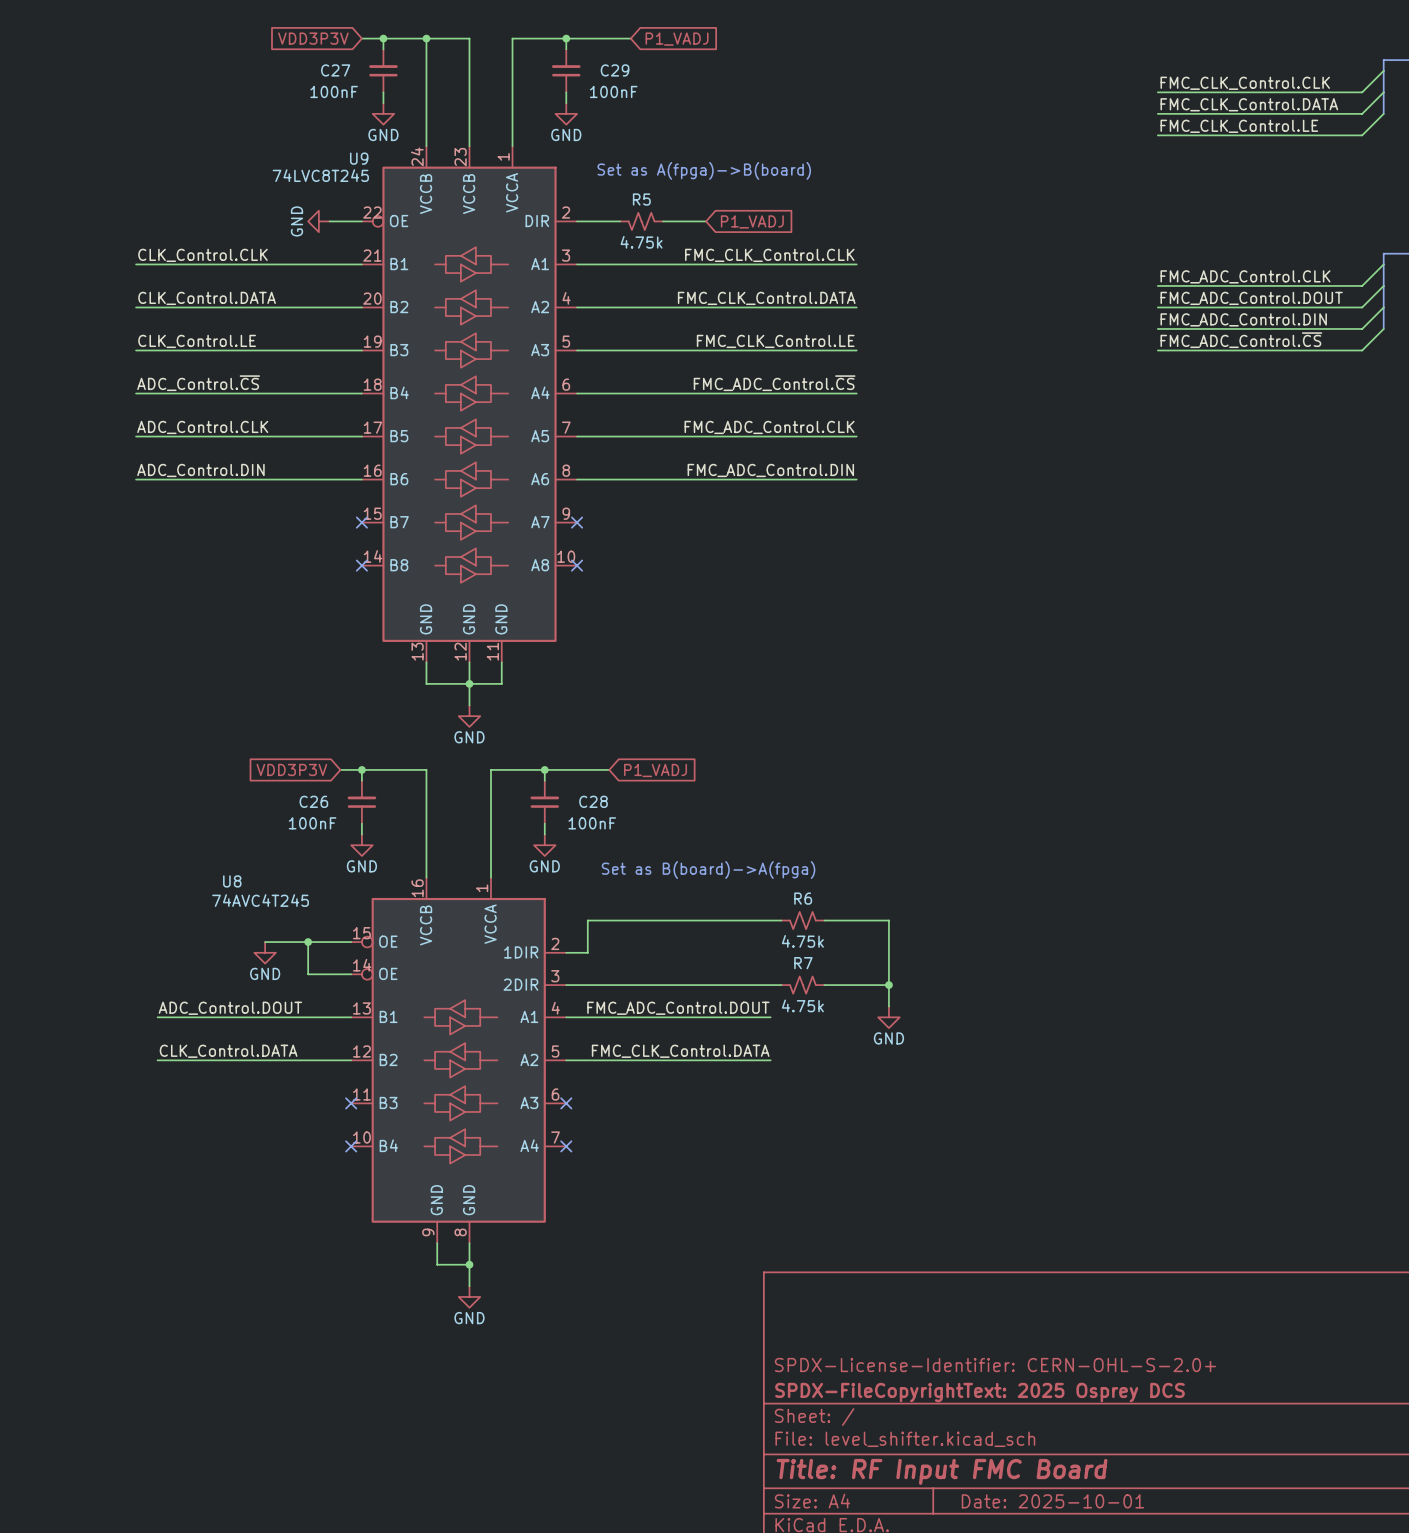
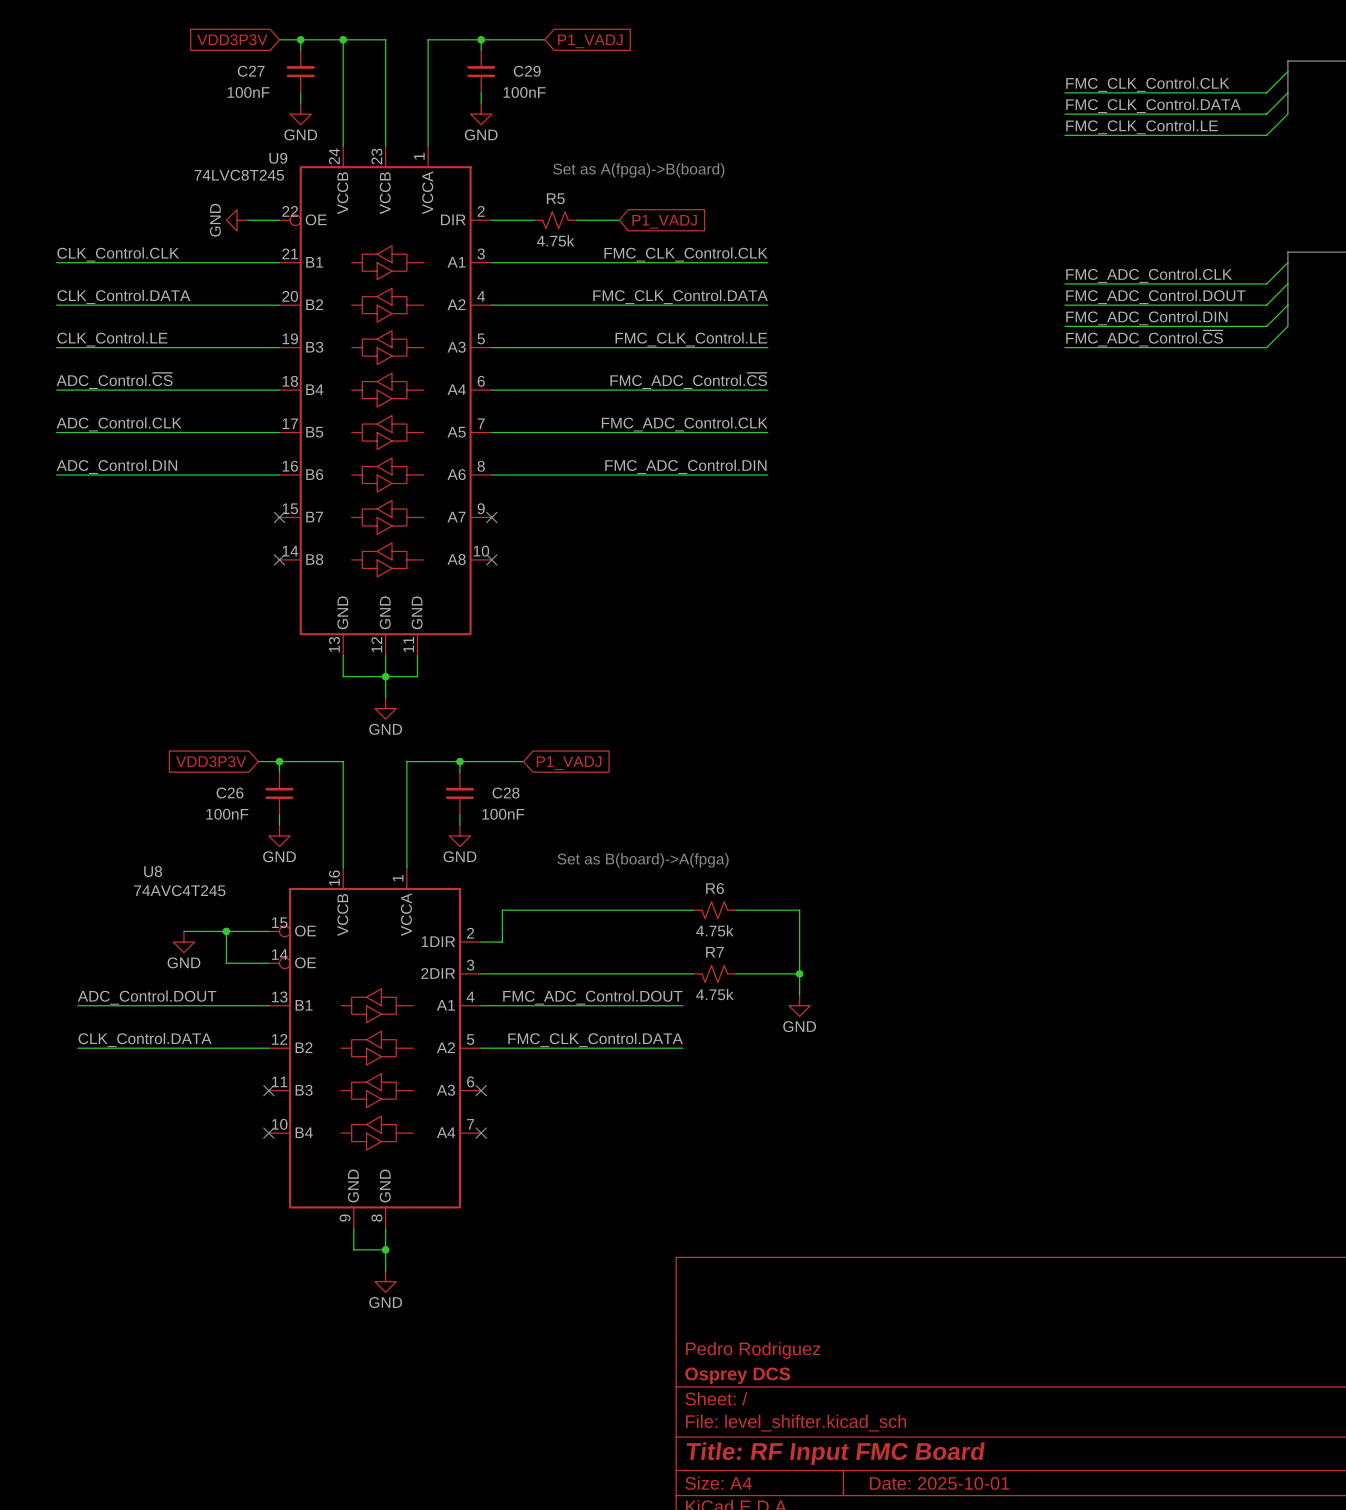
title block: SPDX-License-Identifier: CERN-OHL-S-2.0+ (995, 1365) -> Pedro Rodriguez (753, 1350)
title block: SPDX-FileCopyrightText: 2025 Osprey DCS (979, 1392) -> Osprey DCS (737, 1375)

